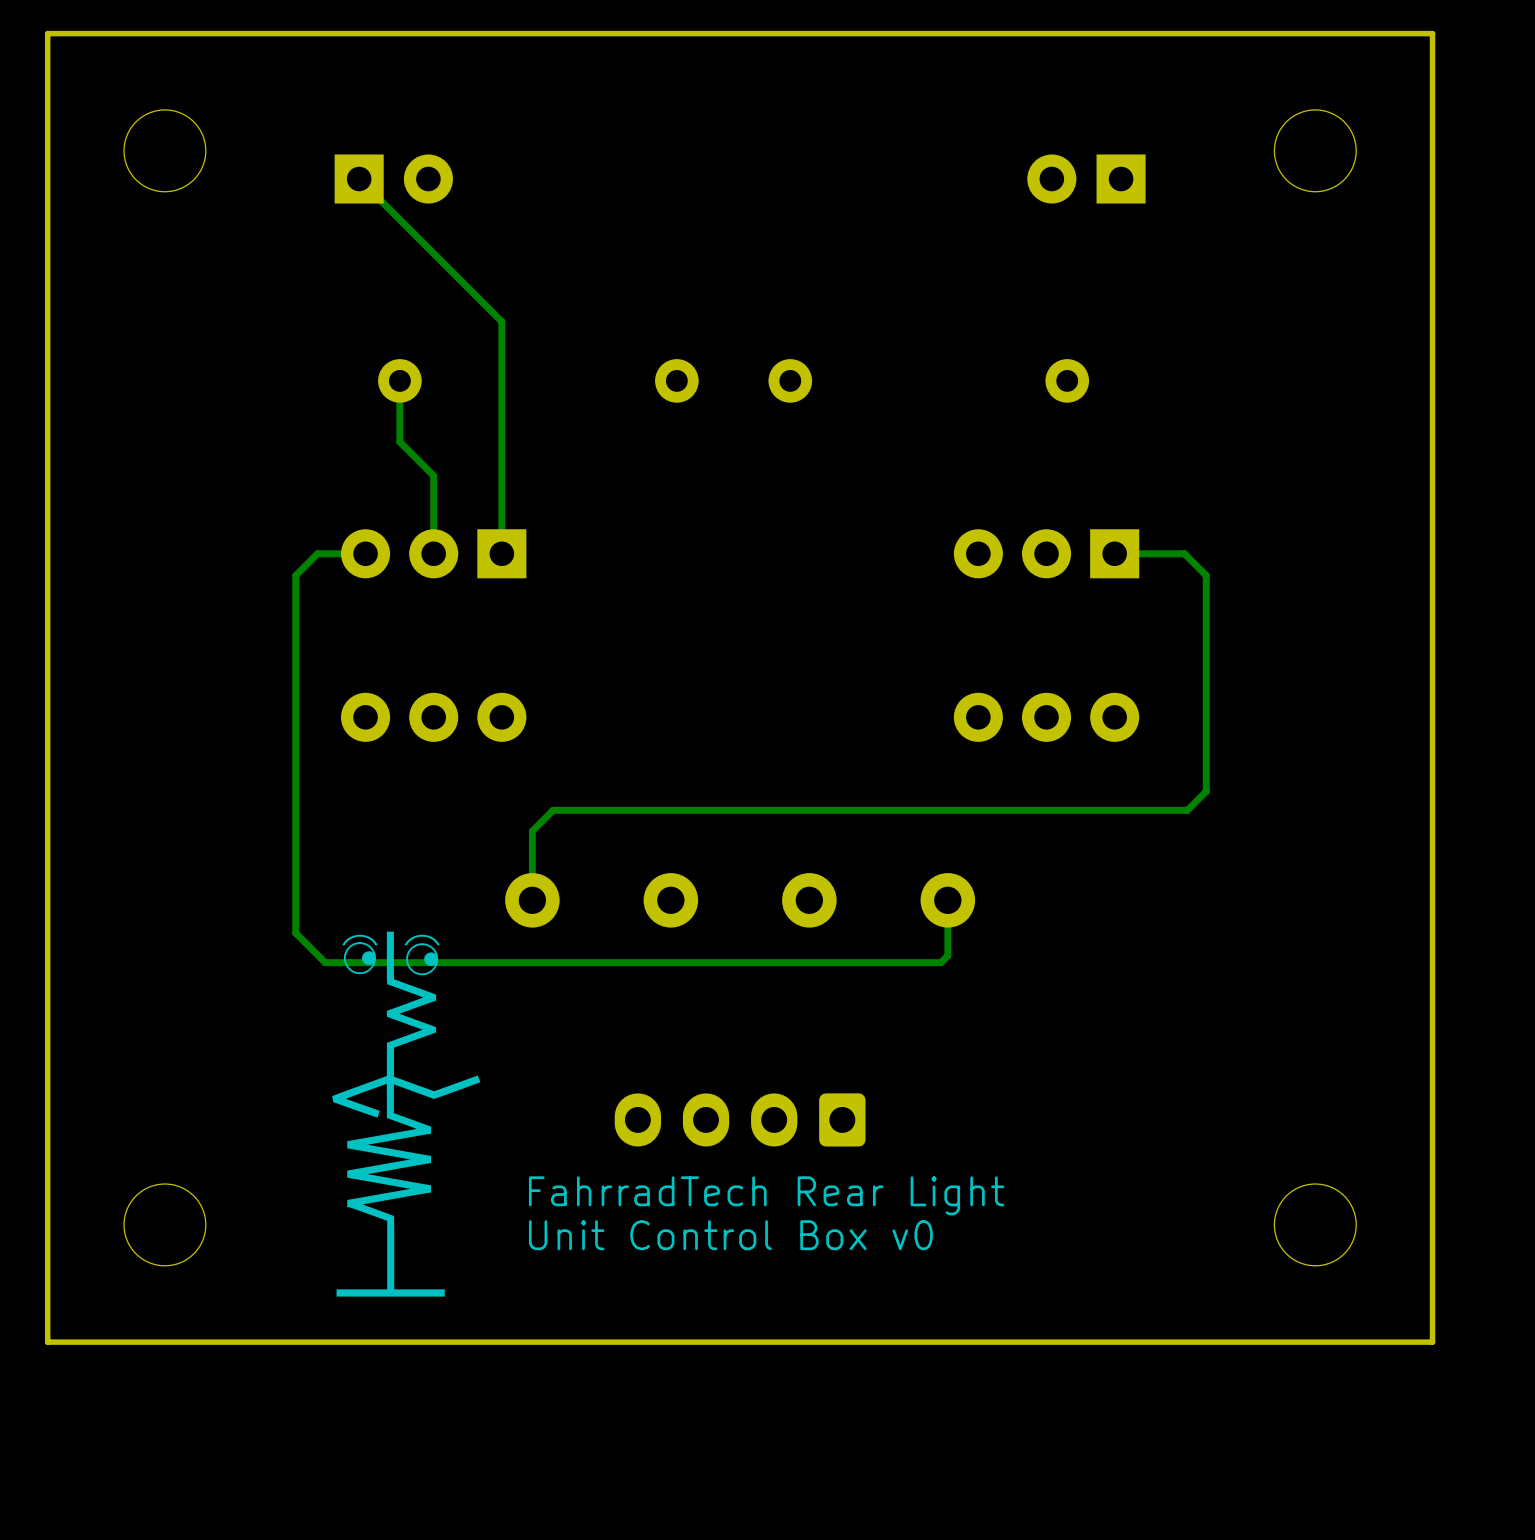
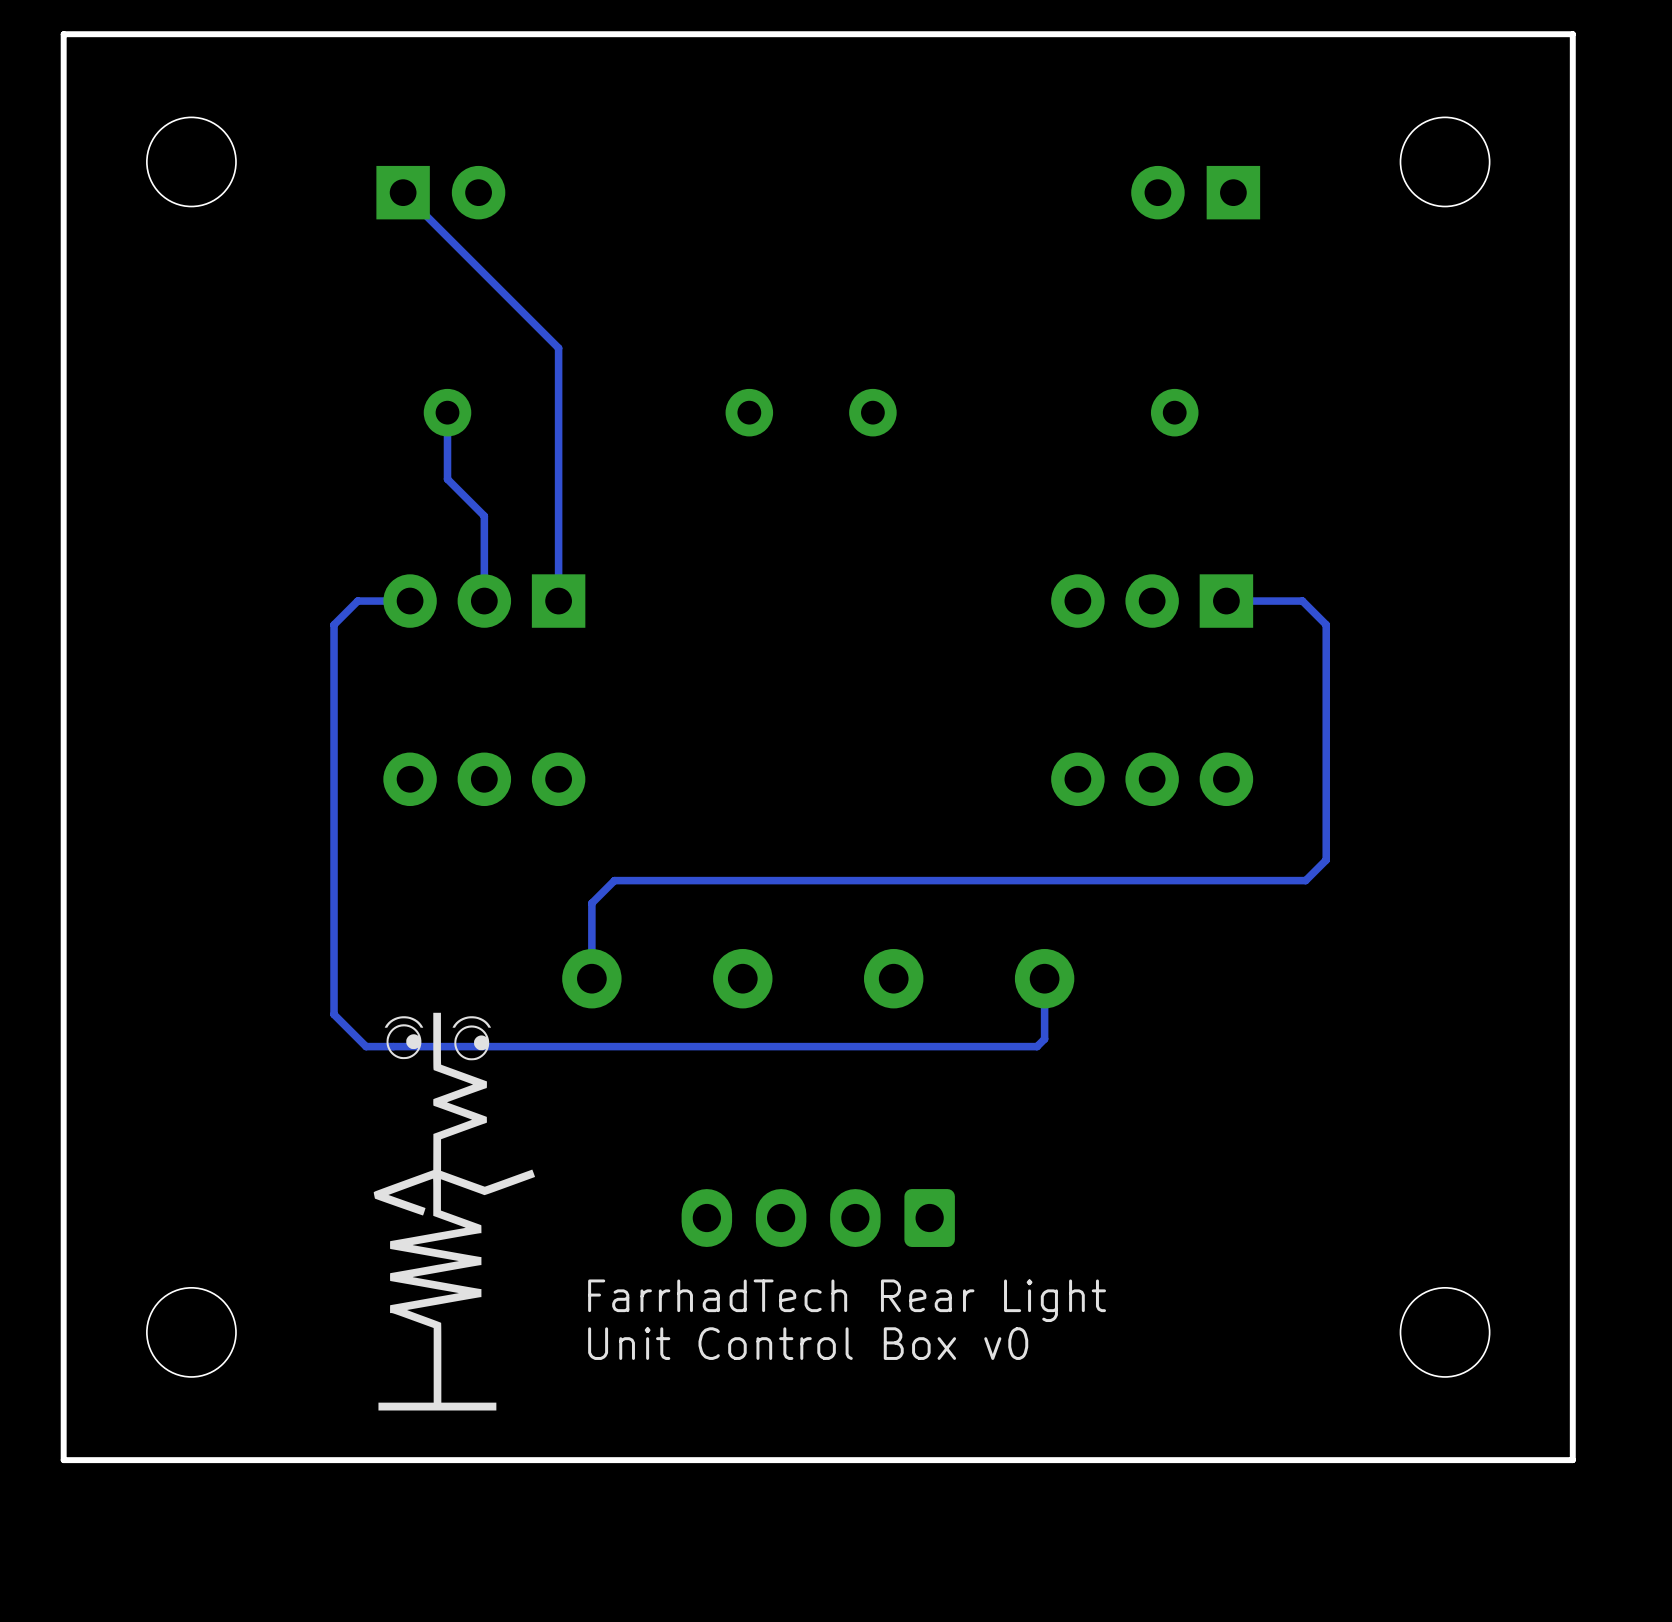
text: FahrradTech Rear Light (766, 1195) -> FarrhadTech Rear Light (847, 1300)

